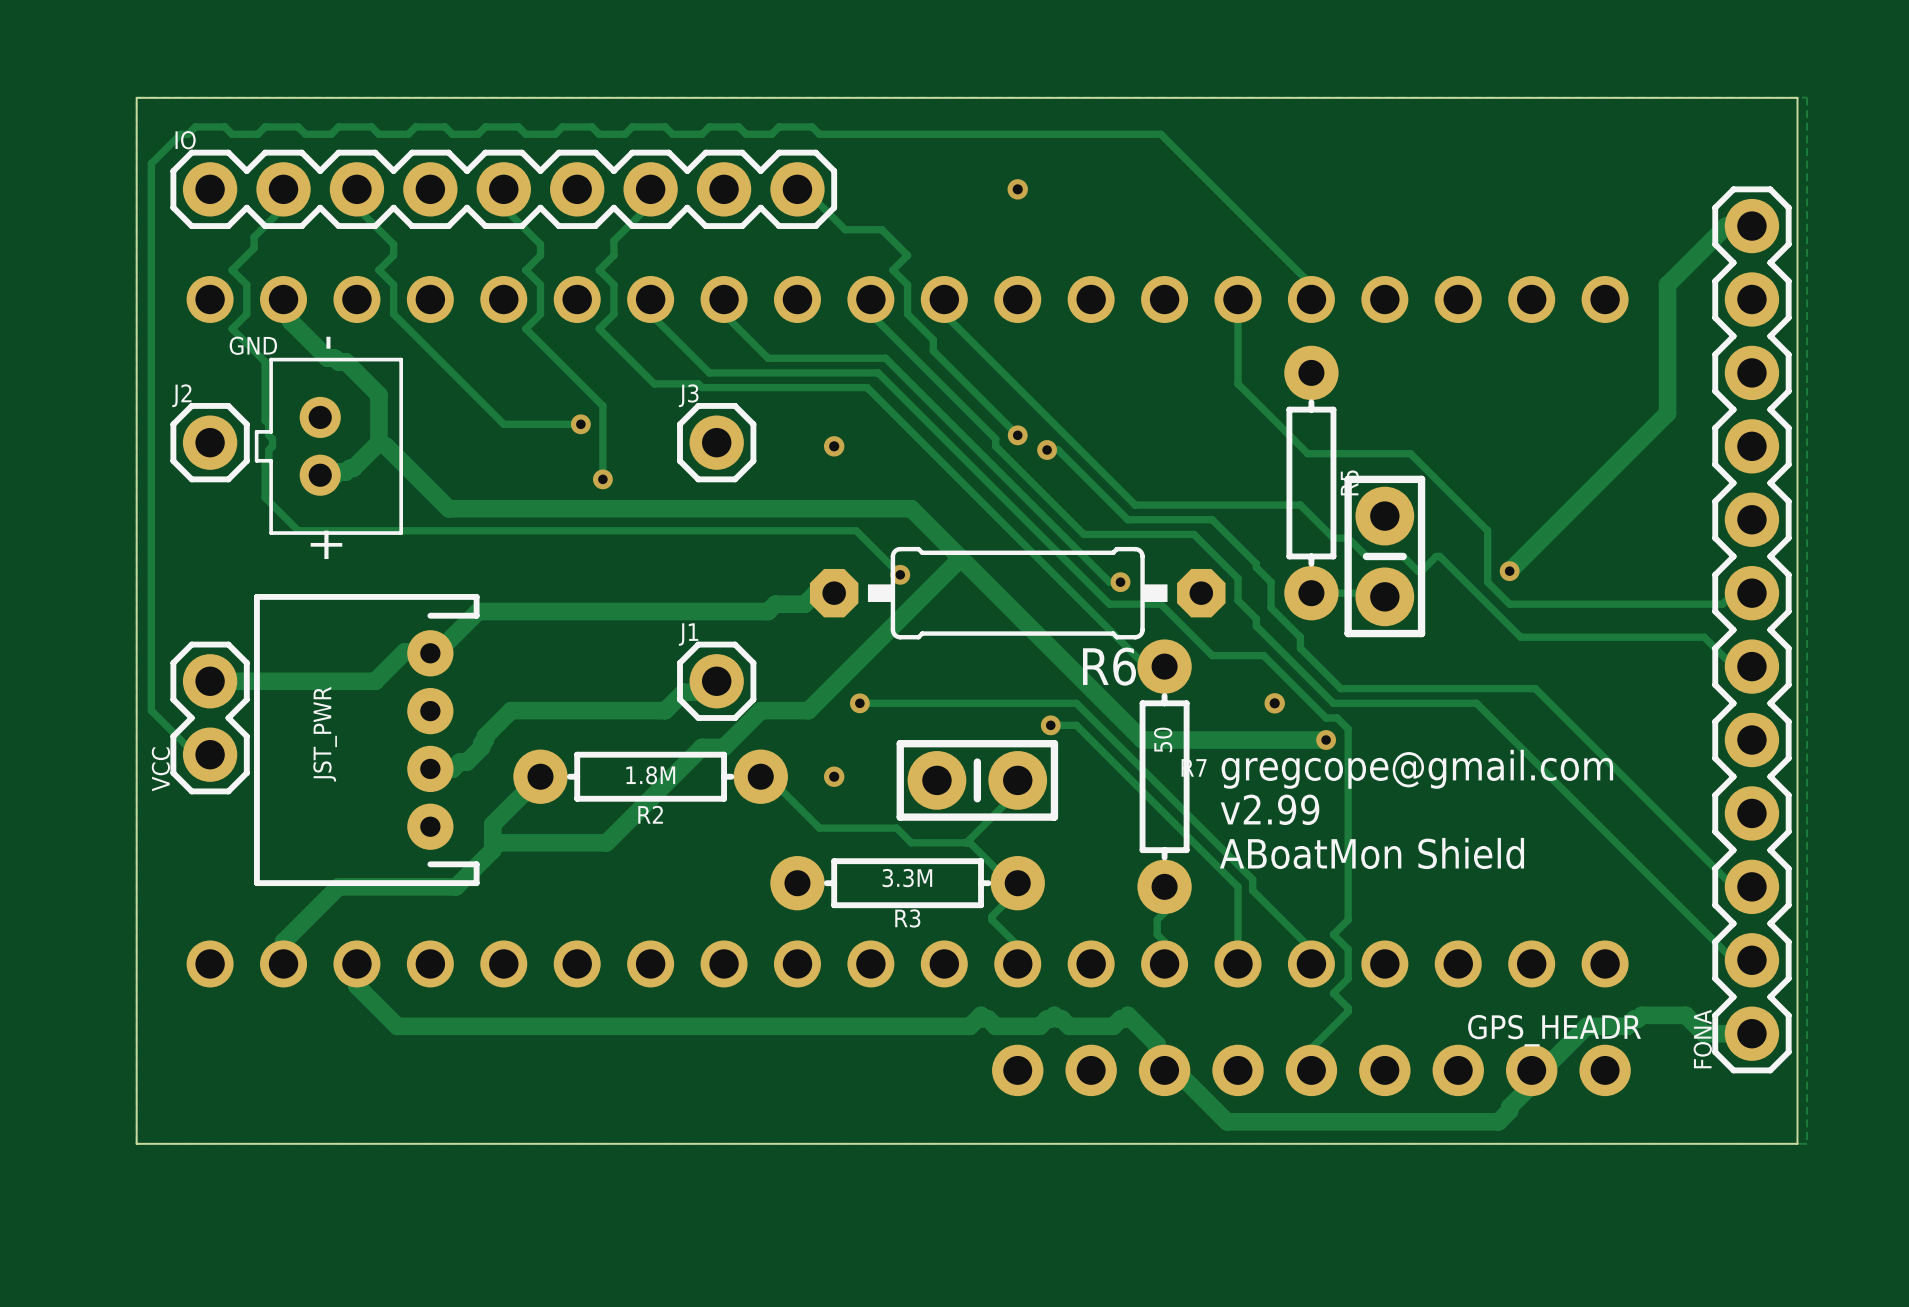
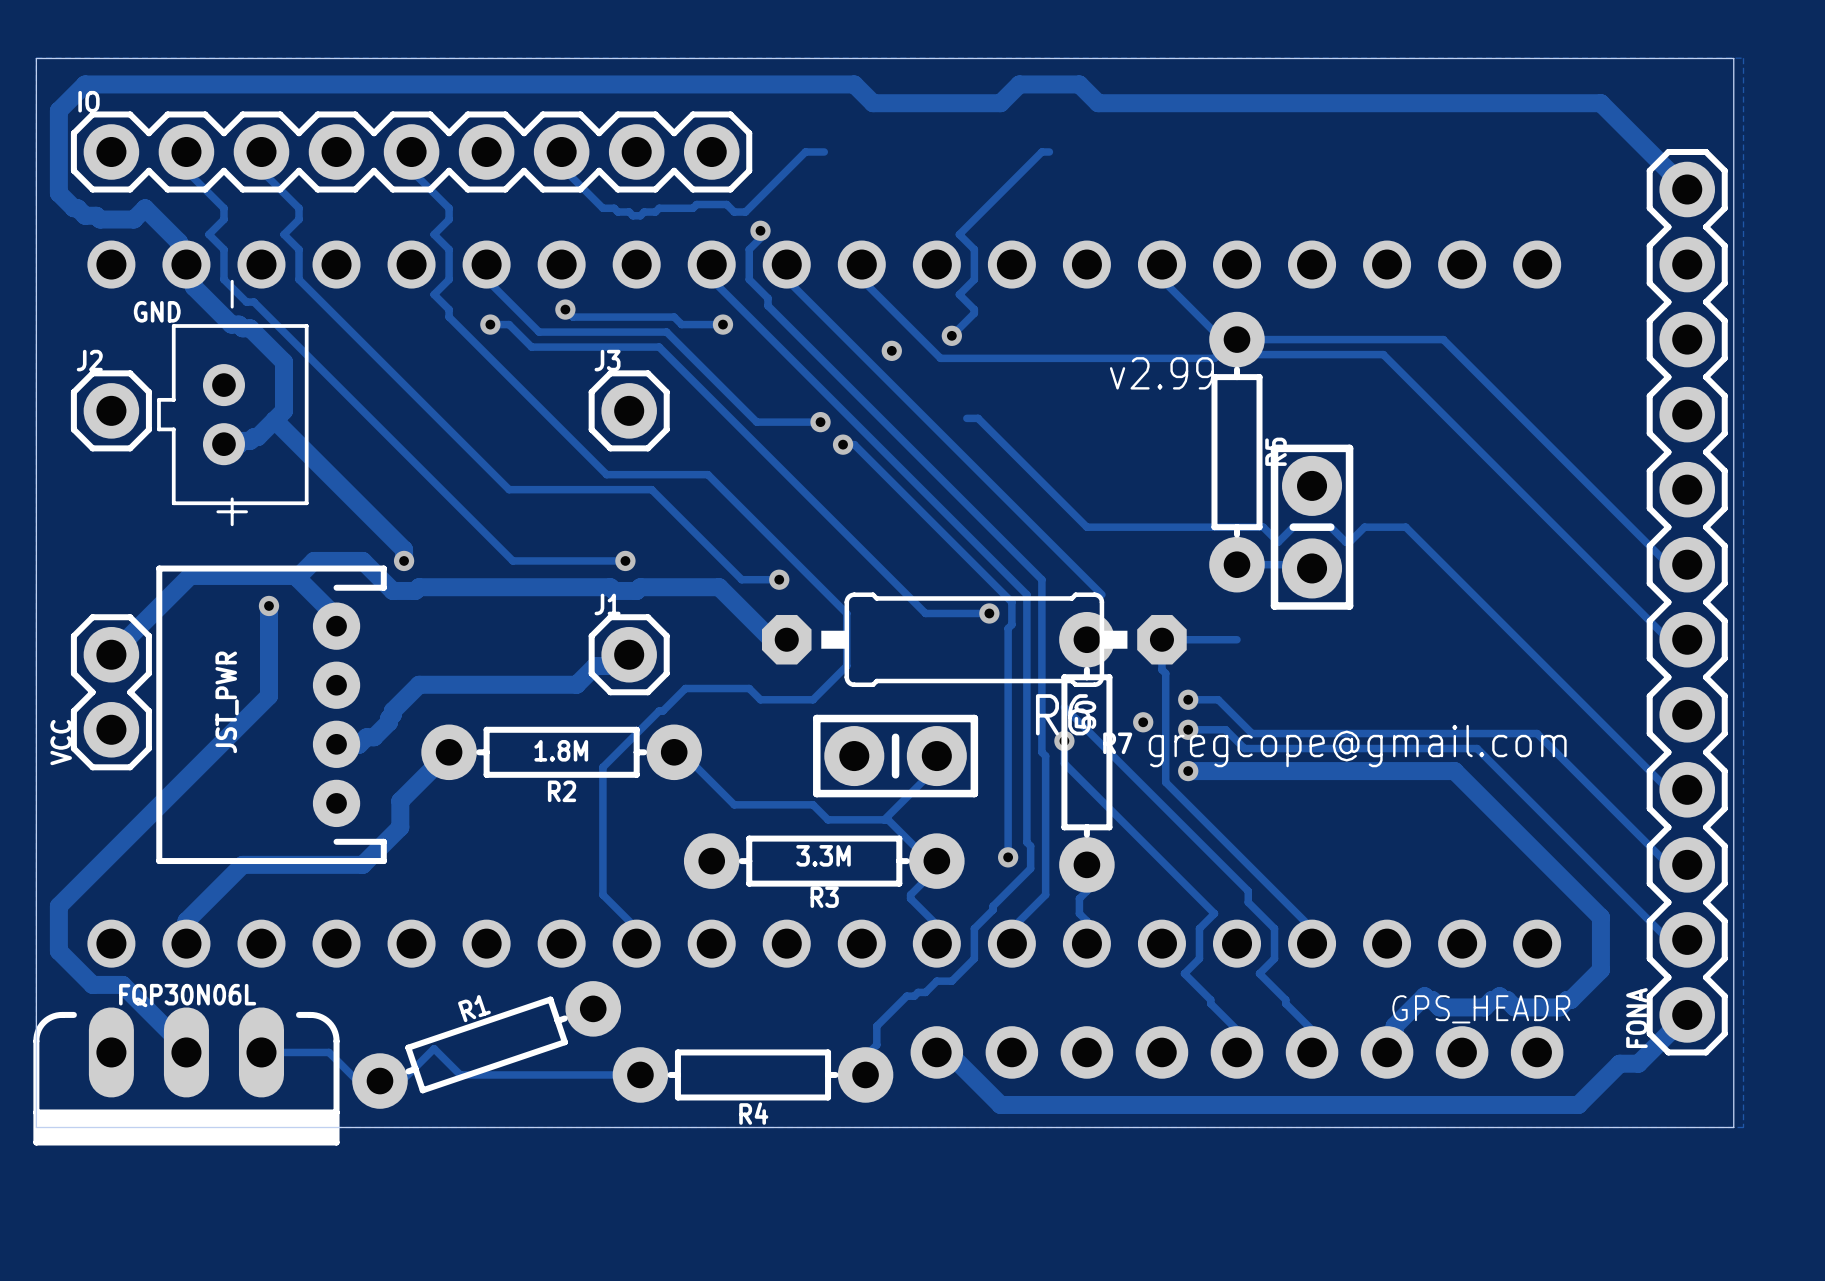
track: (797, 189) (804, 189) (845, 229) (881, 229) (907, 255) (892, 270) (907, 284) (907, 314) (933, 339) (933, 350) (1017, 435) -> none
via: (1017, 189) -> none
track: none -> (1049, 151) (1041, 151) (959, 234) (974, 249) (974, 279) (959, 294) (974, 309) (974, 313) (951, 335)
track: (650, 204) (613, 240) (613, 255) (599, 270) (613, 284) (613, 314) (599, 328) (654, 383) (698, 383) (702, 387) (867, 387) (1146, 666) (1164, 666) -> (561, 167) (602, 208) (614, 208) (617, 212) (629, 212) (632, 215) (640, 215) (644, 212) (655, 212) (659, 208) (692, 208) (696, 204) (726, 204) (734, 212) (745, 212) (805, 151) (824, 151)
track: (283, 207) (254, 237) (254, 248) (232, 270) (246, 284) (246, 314) (232, 328) (265, 361) (265, 420) (268, 424) (268, 435) (272, 438) (272, 446) (268, 450) (268, 461) (265, 464) (265, 497) (298, 530) (856, 530) (900, 574) -> (186, 170) (223, 208) (223, 219) (208, 234) (223, 249) (223, 279) (246, 302) (253, 302) (512, 560) (625, 560)
track: (1751, 226) (1726, 226) (1667, 284) (1667, 413) (1509, 571) -> (1687, 189) (1600, 103) (1098, 103) (1079, 84) (1019, 84) (1000, 103) (873, 103) (854, 84) (85, 84) (58, 110) (58, 193) (73, 208) (77, 208) (85, 215) (96, 215) (100, 219) (133, 219) (145, 208) (178, 242) (178, 245) (190, 257) (186, 264)
track: none -> (760, 230) (764, 234) (749, 249) (749, 279) (768, 298) (768, 305) (1041, 579) (1041, 752) (1045, 756) (1045, 894) (1011, 928) (1011, 943)
via: none -> (760, 230)
track: none -> (486, 264) (486, 279) (539, 332) (666, 332) (756, 422) (820, 422)
track: (650, 299) (650, 314) (709, 372) (878, 372) (1109, 604) (1160, 604) -> (914, 407) (1083, 575)
track: (724, 299) (724, 314) (760, 350) -> (565, 309) (572, 317) (674, 317)
track: none -> (711, 264) (711, 279) (1026, 594) (1026, 842) (1030, 846) (1030, 868) (993, 906) (993, 909) (974, 928) (974, 958) (951, 981) (936, 981) (925, 992) (906, 996) (876, 1026) (876, 1044) (865, 1056) (865, 1074)
track: (1311, 299) (1311, 284) (1160, 134) (819, 134) (812, 126) (779, 126) (771, 134) (746, 134) (738, 126) (709, 126) (702, 134) (672, 134) (665, 126) (632, 126) (624, 134) (599, 134) (591, 126) (562, 126) (555, 134) (525, 134) (518, 126) (485, 126) (478, 134) (452, 134) (445, 126) (415, 126) (408, 134) (378, 134) (371, 126) (338, 126) (331, 134) (305, 134) (298, 126) (265, 126) (257, 134) (232, 134) (224, 126) (195, 126) (188, 134) (180, 134) (151, 163) (151, 710) (195, 754) (210, 754) -> none
track: (1238, 314) (1238, 383) (1307, 453) (1410, 453) (1487, 530) (1487, 582) (1509, 604) (1722, 604) (1733, 593) -> (1161, 279) (1221, 339) (1443, 339) (1668, 564)
track: (540, 343) (602, 405) (602, 479) -> (449, 309) (449, 317) (606, 474) (707, 474) (846, 613) (846, 666) (813, 699) (760, 699) (749, 688) (685, 688) (662, 711) (659, 711) (602, 767) (602, 894) (636, 928) (636, 943)
via: none -> (565, 309)
track: none -> (490, 324) (509, 324) (531, 347) (659, 347) (925, 613) (989, 613)
via: none -> (490, 324)
track: (808, 358) (885, 358) (1109, 582) (1120, 582) -> none
via: none -> (722, 324)
via: none -> (951, 335)
via: none -> (891, 350)
track: (1021, 391) (1135, 505) (1300, 505) (1333, 538) (1348, 538) (1366, 556) -> (1049, 489) (1086, 527) (1263, 527) (1278, 542) (1293, 527)
track: none -> (940, 358) (1214, 358) (1218, 354) (1383, 354) (1638, 609)
track: (503, 424) (580, 424) -> (411, 392) (509, 489) (651, 489) (741, 579) (779, 579)
via: (580, 424) -> none
via: (1017, 435) -> none
track: (995, 438) (995, 446) (1083, 534) (1193, 534) (1238, 578) (1238, 600) (1256, 618) (1256, 626) (1333, 703) (1476, 703) (1546, 773) -> (1188, 729) (1225, 729) (1244, 748) (1477, 748)
track: (378, 442) (386, 446) (448, 508) (911, 508) (1142, 740) (1326, 740) -> none
via: (834, 446) -> none
via: (1047, 450) -> none
track: none -> (274, 420) (404, 549) (404, 560)
via: none -> (820, 422)
track: none -> (843, 444) (854, 444) (1011, 602) (1011, 624) (1008, 628) (1008, 857)
via: none -> (843, 444)
via: (602, 479) -> none
track: (1127, 519) (1212, 519) (1256, 563) (1256, 567) (1271, 582) (1271, 607) (1300, 637) (1300, 648) (1340, 688) (1535, 688) (1605, 758) -> (1188, 699) (1218, 699) (1252, 733) (1537, 733)
track: (1439, 556) (1520, 637) (1704, 637) -> (1368, 527) (1405, 527) (1668, 789) (1687, 789)
track: (960, 558) (808, 710) (760, 710) (724, 747) (702, 747) (606, 842) (492, 842) -> none
via: (1509, 571) -> none
via: (900, 574) -> none
via: (1120, 582) -> none
via: none -> (404, 560)
via: none -> (625, 560)
track: (834, 593) (815, 593) (804, 604) (775, 604) (768, 611) (478, 611) (437, 651) (430, 653) -> none
R6 position: (1017, 593) -> (974, 639)
track: none -> (297, 577) (314, 560) (362, 560) (392, 590) (415, 590) (419, 587) (610, 587) (614, 590) (636, 590) (640, 587) (719, 587) (771, 639) (786, 639)
via: none -> (779, 579)
track: (1179, 622) (1212, 655) (1263, 655) (1326, 717) (1337, 717) (1348, 729) (1348, 919) (1333, 934) -> (1064, 707) (1248, 891) (1248, 902) (1259, 913)
track: none -> (268, 605) (268, 696) (58, 906) (58, 951) (92, 984) (122, 984) (175, 1037) (175, 1041) (186, 1052)
via: none -> (268, 605)
via: none -> (989, 613)
track: (430, 651) (404, 651) (375, 681) (210, 681) -> (336, 624) (336, 617) (295, 575) (190, 575) (111, 654)
track: none -> (1236, 639) (1161, 639) (1161, 669) (1165, 673) (1165, 782) (1312, 928) (1312, 943)
track: (859, 703) (1076, 703) (1252, 879) (1252, 890) (1311, 949) (1311, 963) -> none
via: (859, 703) -> none
via: (1274, 703) -> none
track: (1050, 725) (1076, 725) (1238, 886) (1238, 963) -> none
via: (1050, 725) -> none
via: none -> (1188, 699)
via: (1326, 740) -> none
via: none -> (1143, 722)
via: none -> (1188, 729)
track: none -> (1064, 741) (1064, 763) (1214, 913) (1199, 928) (1199, 958) (1184, 973) (1236, 1029)
via: none -> (1064, 741)
via: (834, 776) -> none
track: none -> (1188, 771) (1454, 771) (1600, 917) (1600, 969) (1574, 996)
via: none -> (1188, 771)
text position: v2.99 (1270, 809) -> v2.99 (1161, 373)
text: ABoatMon Shield (1371, 853) -> none
via: none -> (1008, 857)
track: (356, 963) (356, 985) (397, 1026) (970, 1026) (981, 1015) (995, 1026) (1039, 1026) (1054, 1015) (1069, 1026) (1113, 1026) (1127, 1015) (1157, 1044) (1157, 1048) (1164, 1055) (1164, 1070) (1171, 1066) (1226, 1121) -> (936, 1052) (948, 1052) (1000, 1104) (1150, 1104)
track: (1348, 1008) (1348, 1011) (1311, 1048) -> (1274, 988) (1285, 999) (1285, 1003) (1312, 1029) (1312, 1052)
track: (1641, 1015) (1685, 1015) (1704, 1033) (1751, 1033) -> (1428, 1104) (1578, 1104) (1619, 1063) (1638, 1063) (1687, 1014)
track: (1586, 1026) (1542, 1070) (1531, 1070) (1528, 1077) (1528, 1088) (1509, 1107) (1509, 1110) (1498, 1121) -> (1518, 1007) (1514, 1007) (1507, 999) (1503, 999) (1499, 996) (1495, 999) (1492, 999) (1484, 1007) (1439, 1007) (1432, 999) (1428, 999) (1424, 996) (1394, 1026) (1394, 1029) (1387, 1037) (1387, 1052)
R1: none -> (486, 1044)
track: none -> (261, 1052) (329, 1052) (355, 1078) (377, 1078) (379, 1081) (381, 1078) (404, 1078) (434, 1048) (460, 1074) (640, 1074)
R4: none -> (752, 1074)
FQP30N06L: none -> (186, 1076)

